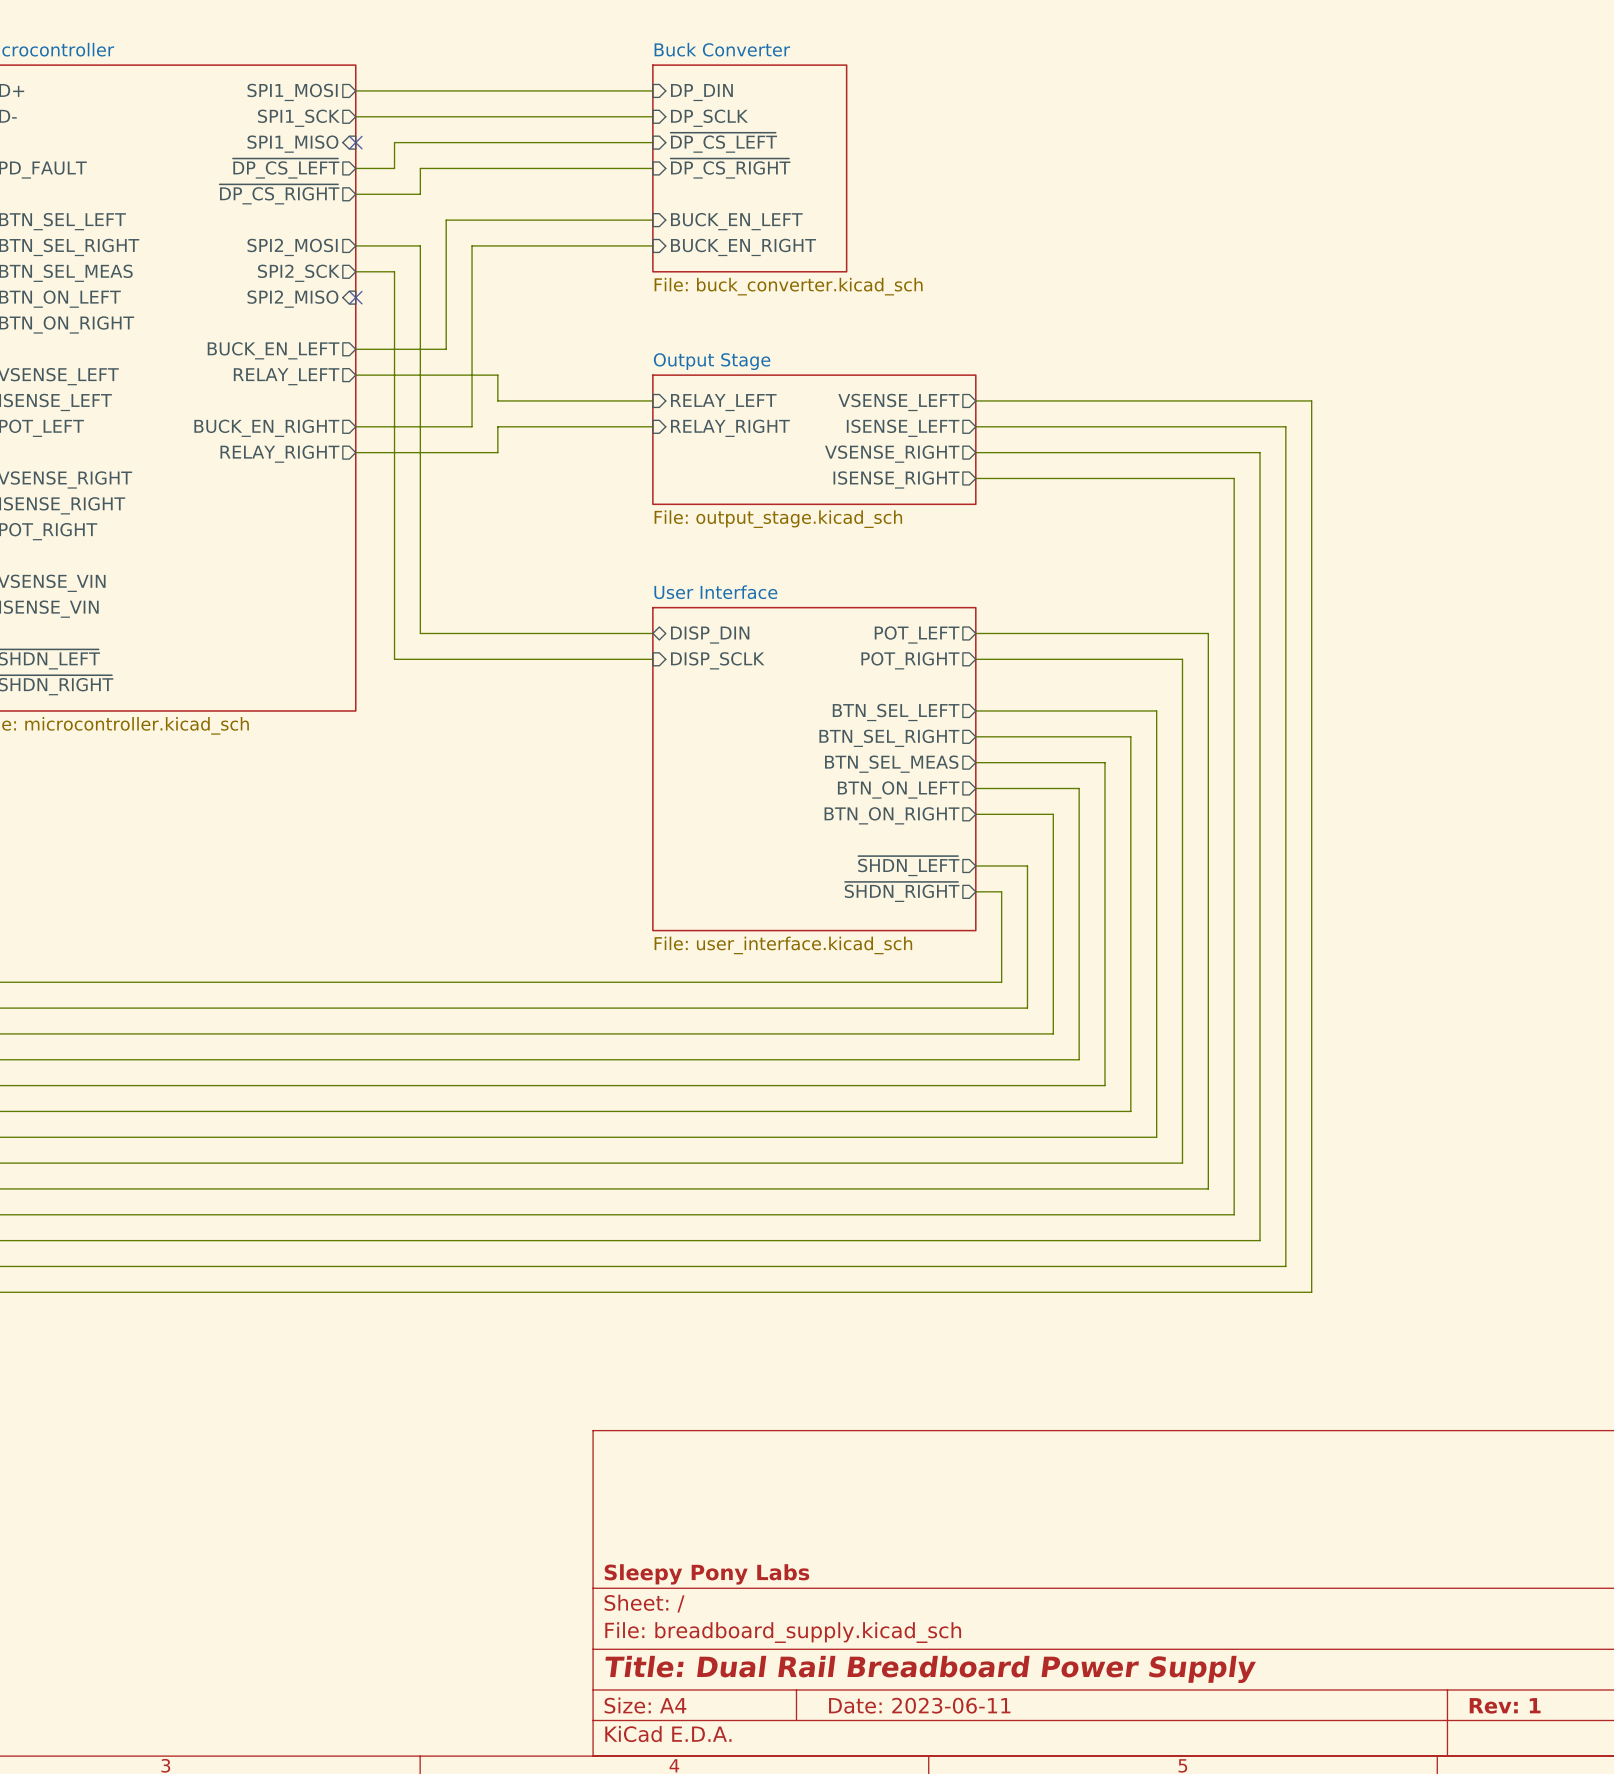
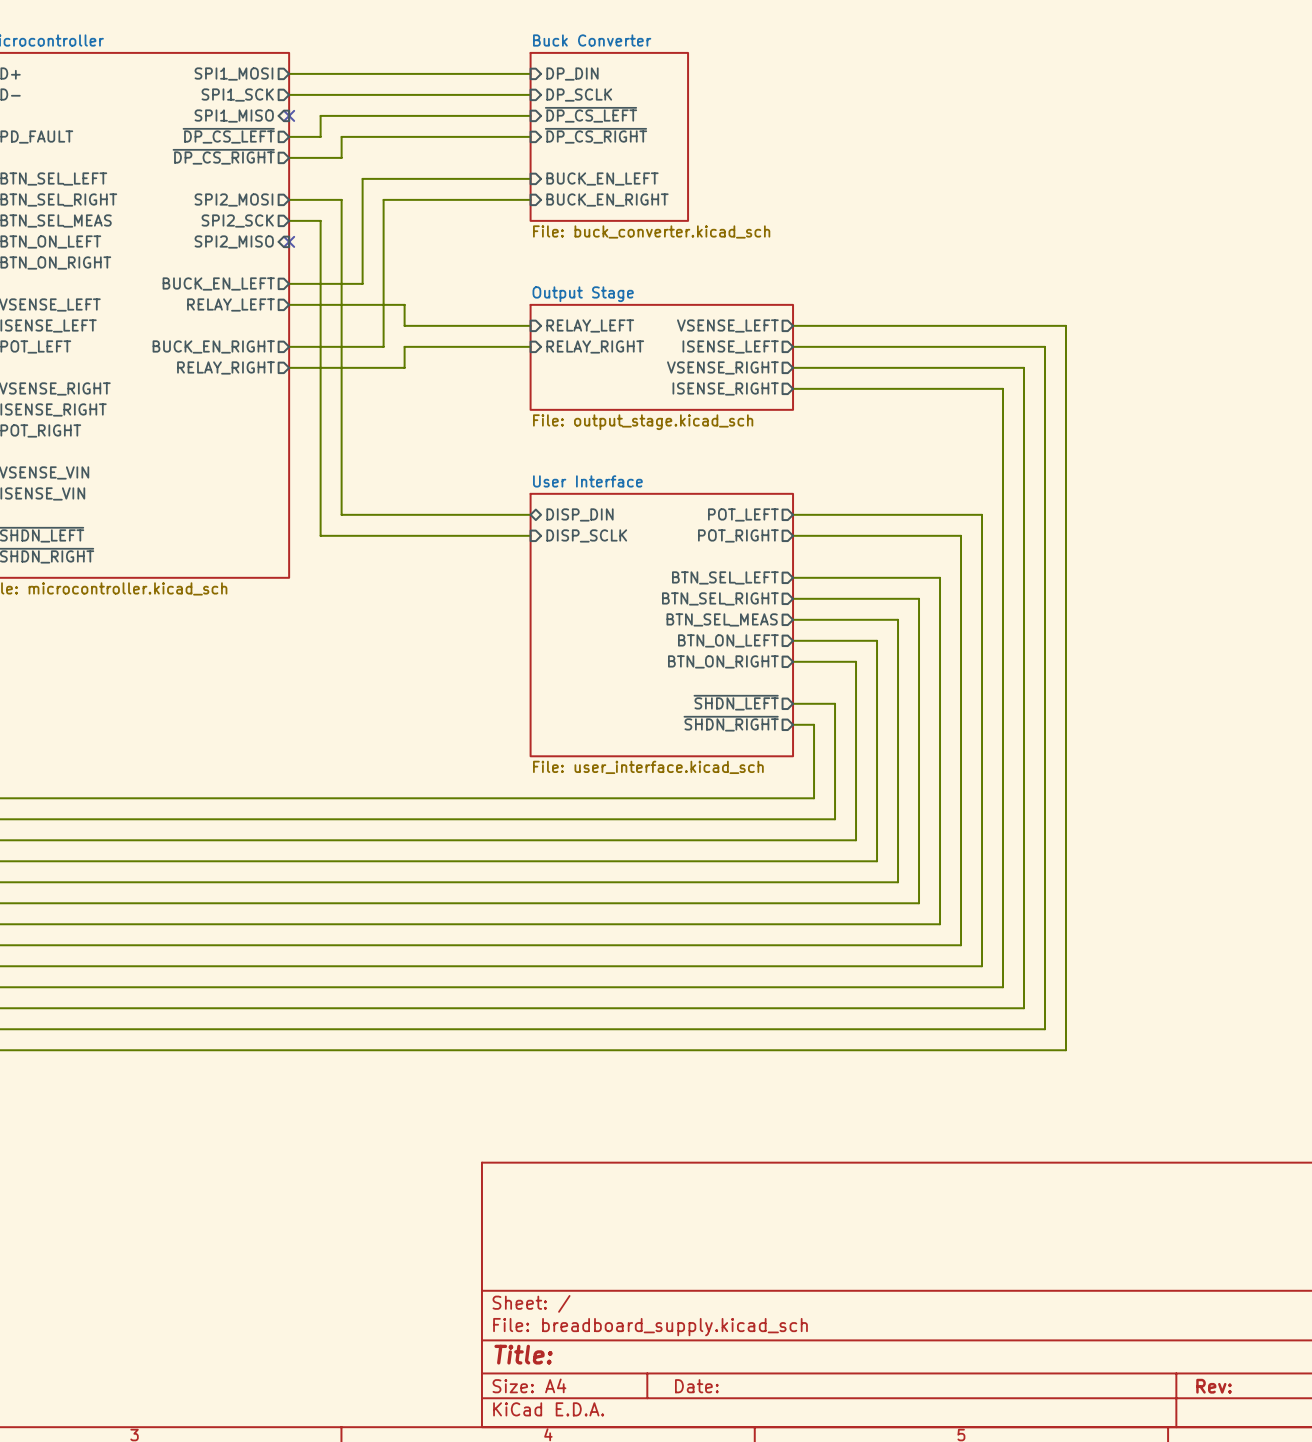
title block: Sleepy Pony Labs (706, 1574) -> none
title block: Title: Dual Rail Breadboard Power Supply (930, 1669) -> Title: (523, 1354)
title block: Date: 2023-06-11 (919, 1705) -> Date: (696, 1386)
title block: Rev: 1 (1505, 1705) -> Rev: (1214, 1386)

